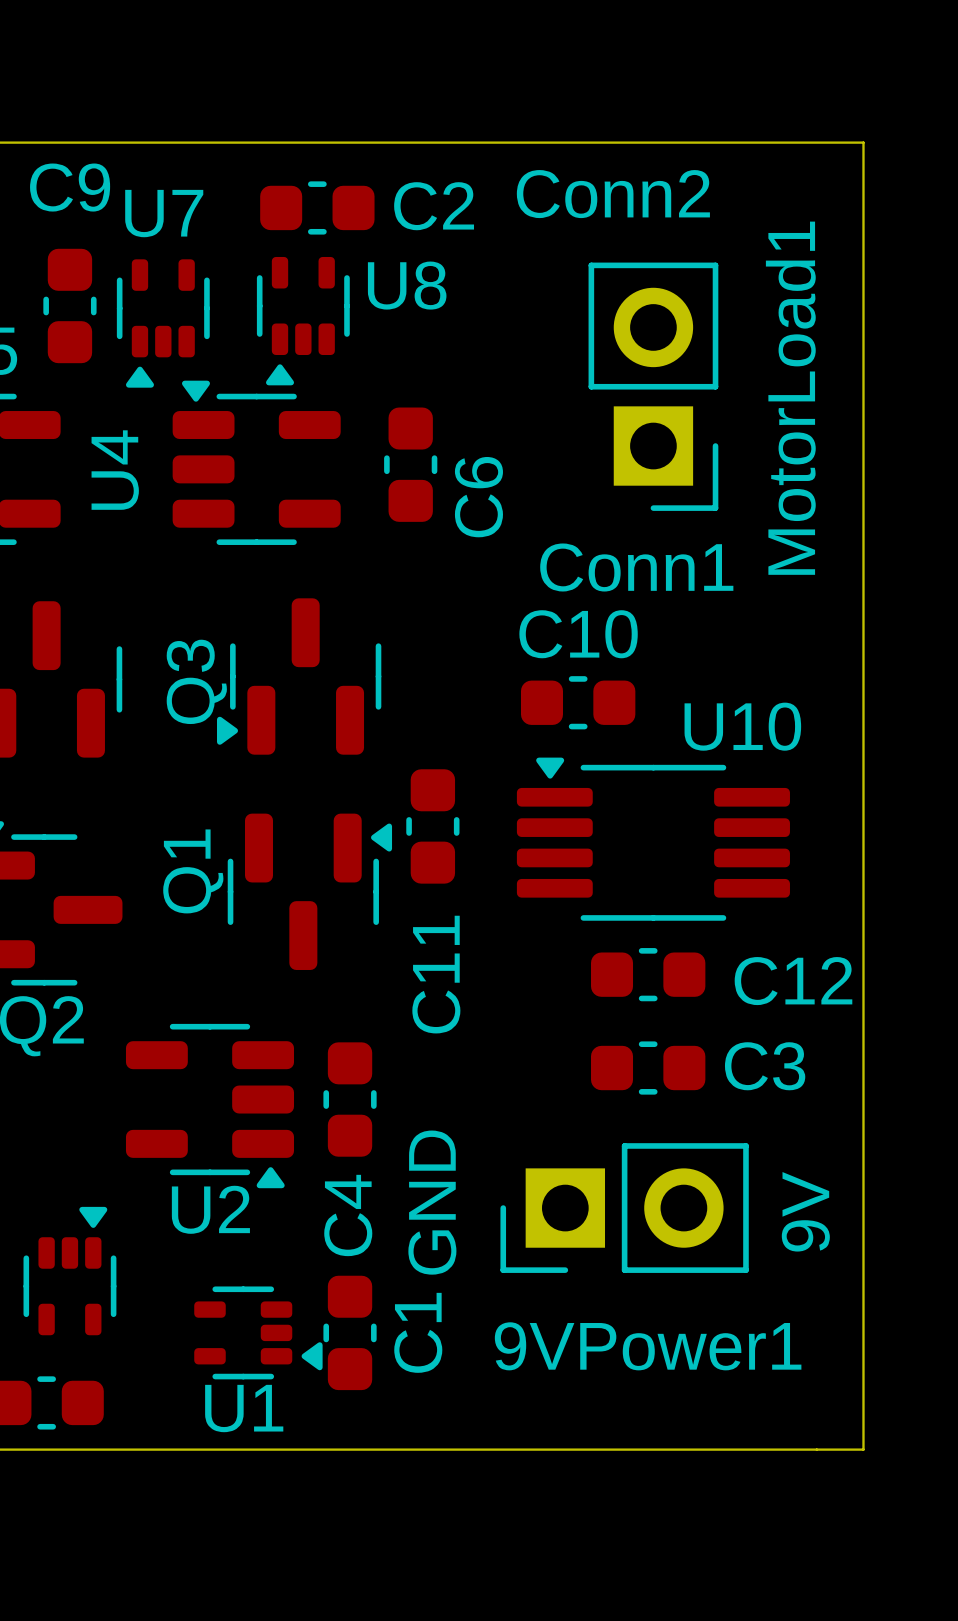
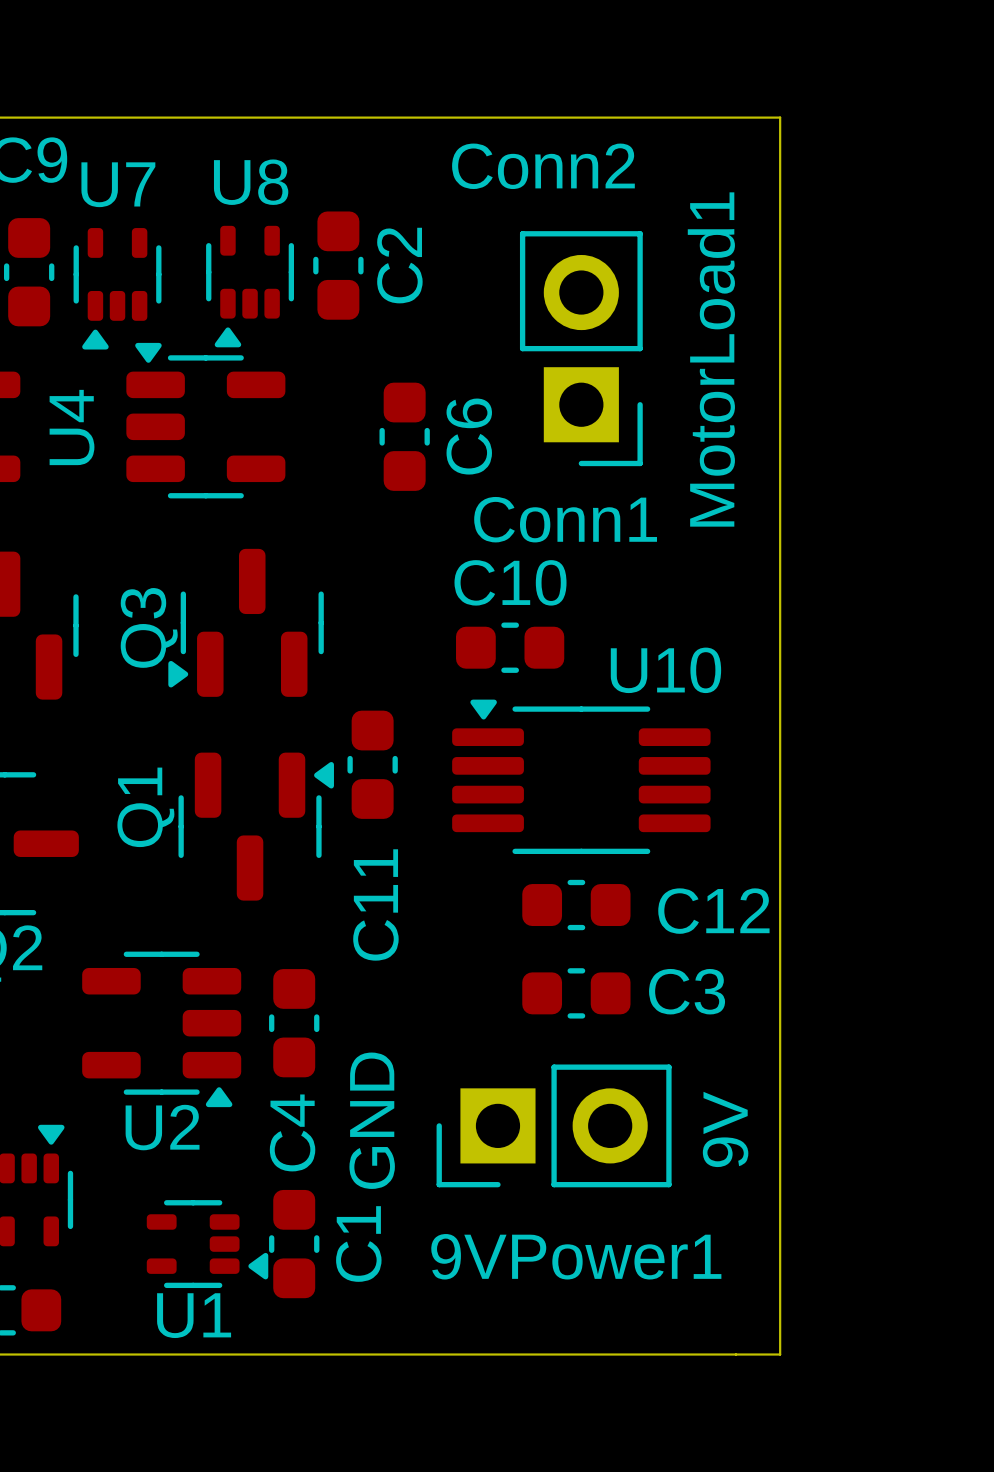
C2 rotation: 0° (317, 207) -> 90° clockwise (338, 265)
C2 position: (317, 207) -> (338, 265)
U8 name position: U8 (407, 285) -> U8 (251, 182)
C6 position: (410, 464) -> (404, 436)
C6 name position: C6 (478, 497) -> C6 (469, 436)

